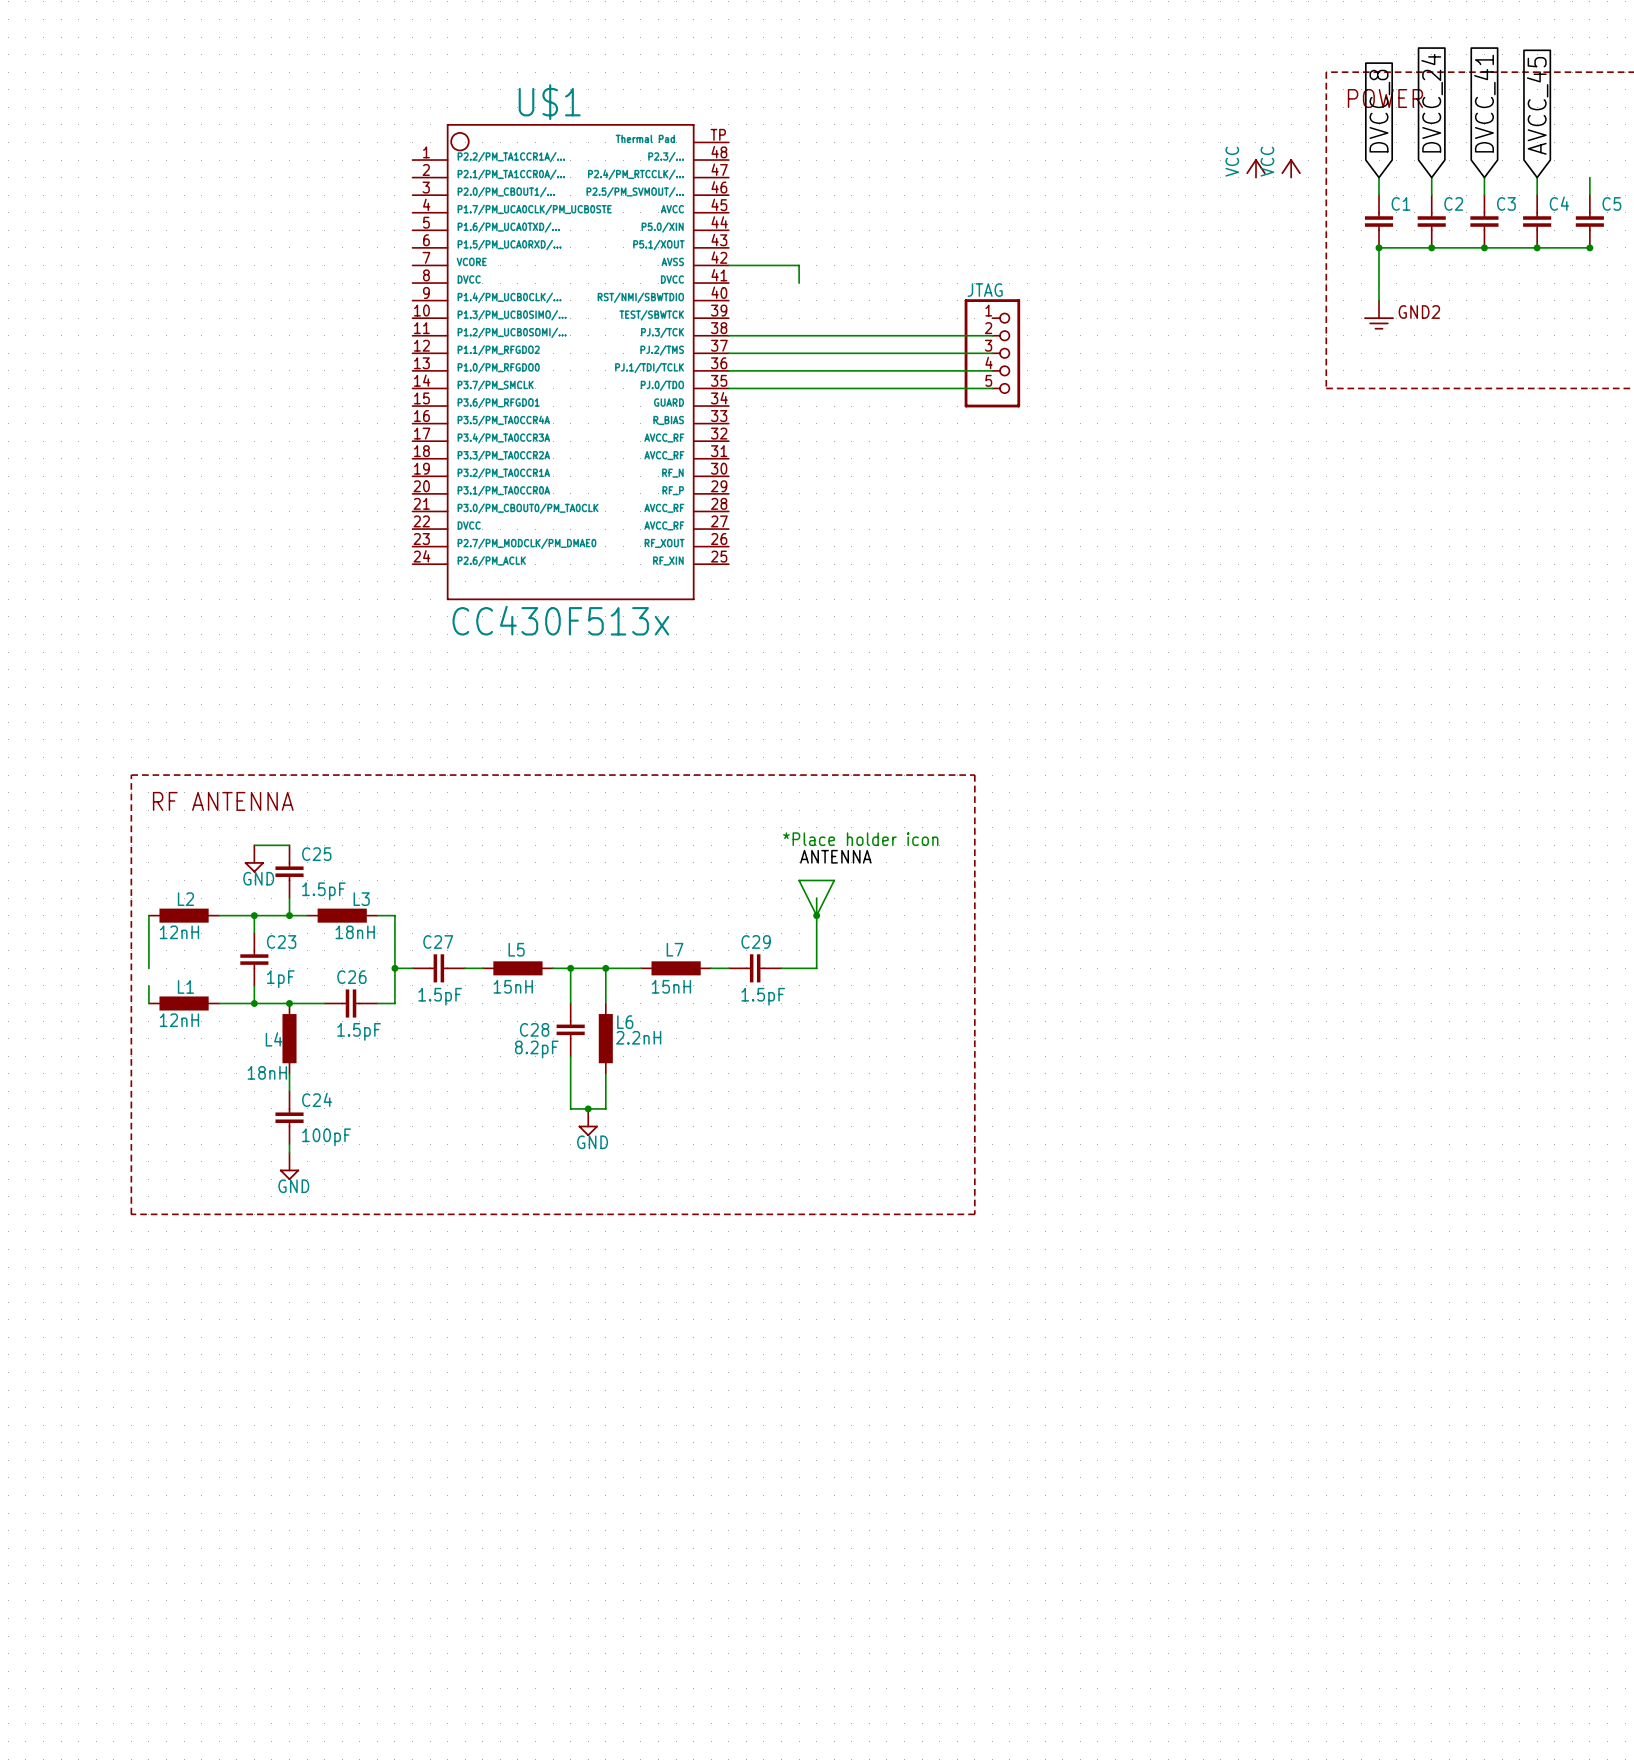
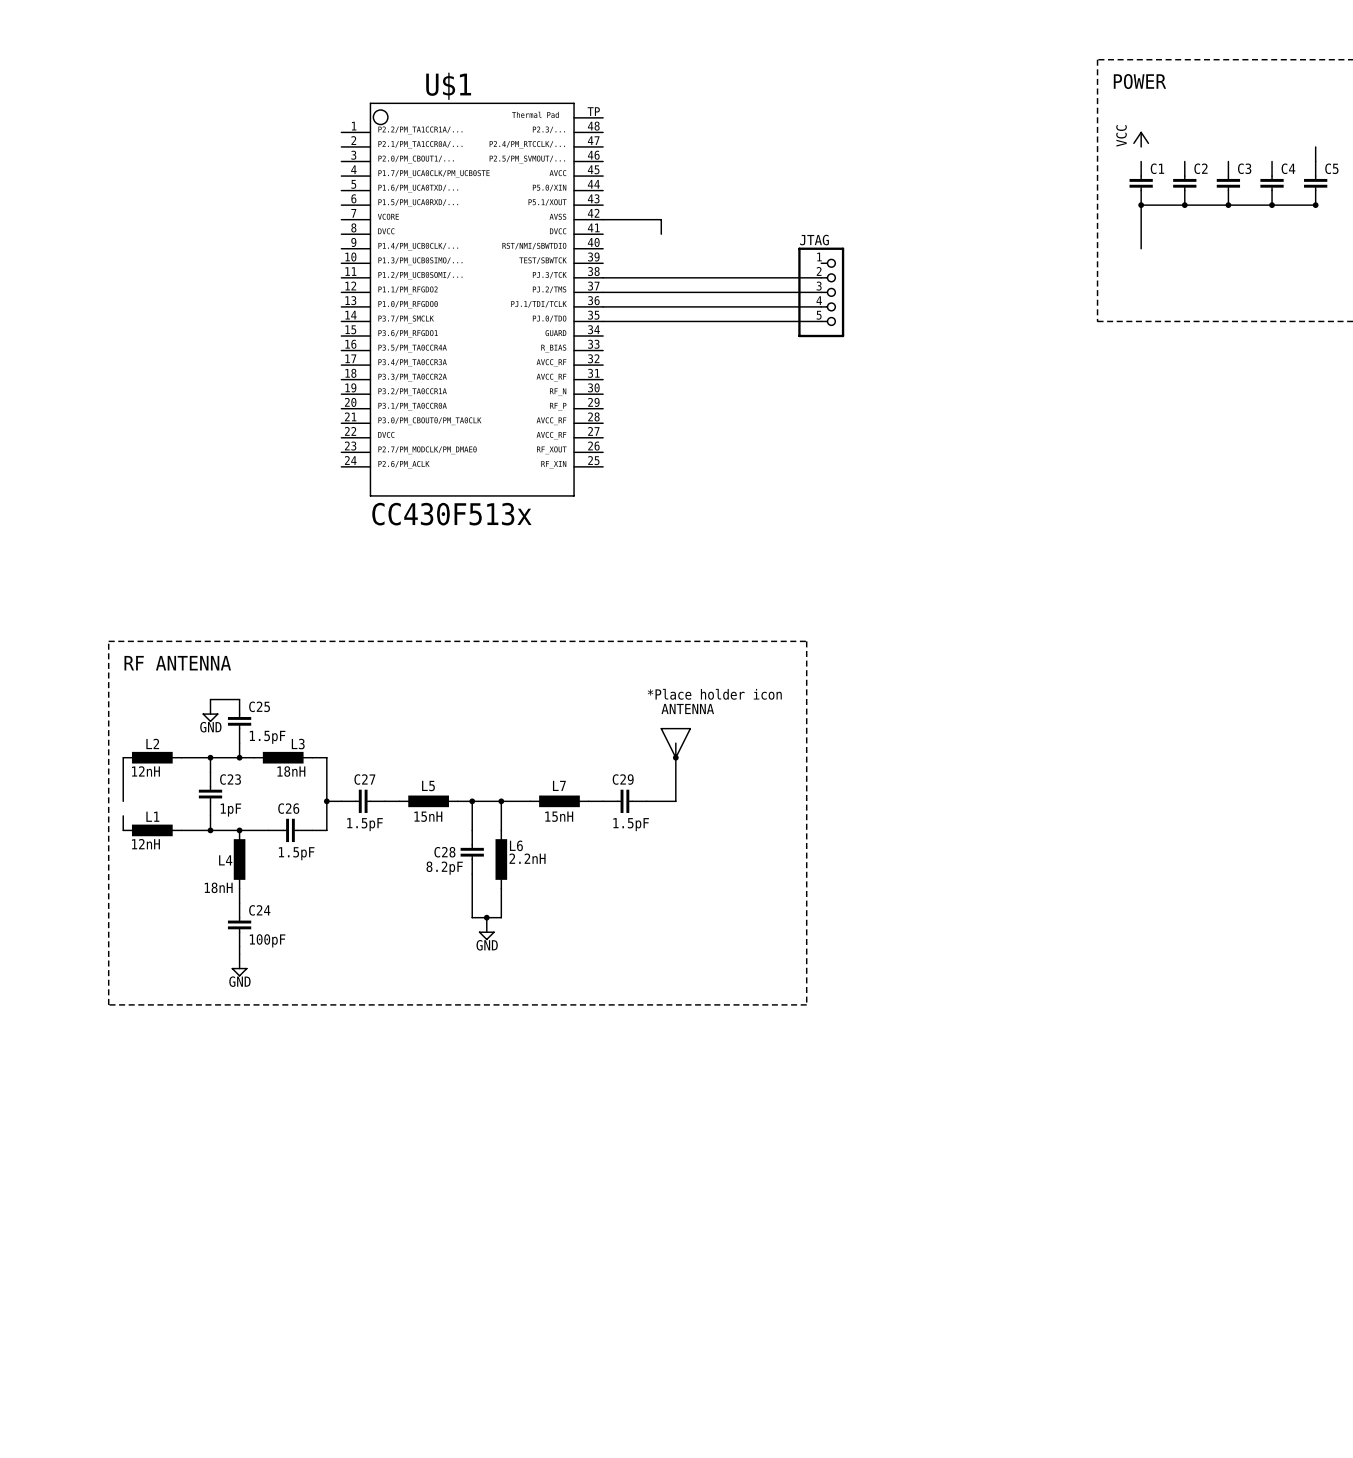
global label: DVCC_24 (1432, 103) -> none
global label: DVCC_41 (1484, 103) -> none
global label: AVCC_45 (1537, 105) -> none
global label: DVCC_8 (1379, 111) -> none
power symbol: VCC (1255, 168) -> none
power symbol: VCC (1291, 168) -> none
power symbol: none -> VCC (1141, 139)
wire: (1379, 177) (1379, 195) -> none
wire: (1431, 177) (1431, 195) -> none
wire: (1484, 177) (1484, 195) -> none
wire: (1537, 177) (1537, 195) -> none
GND2: (1379, 315) -> none

